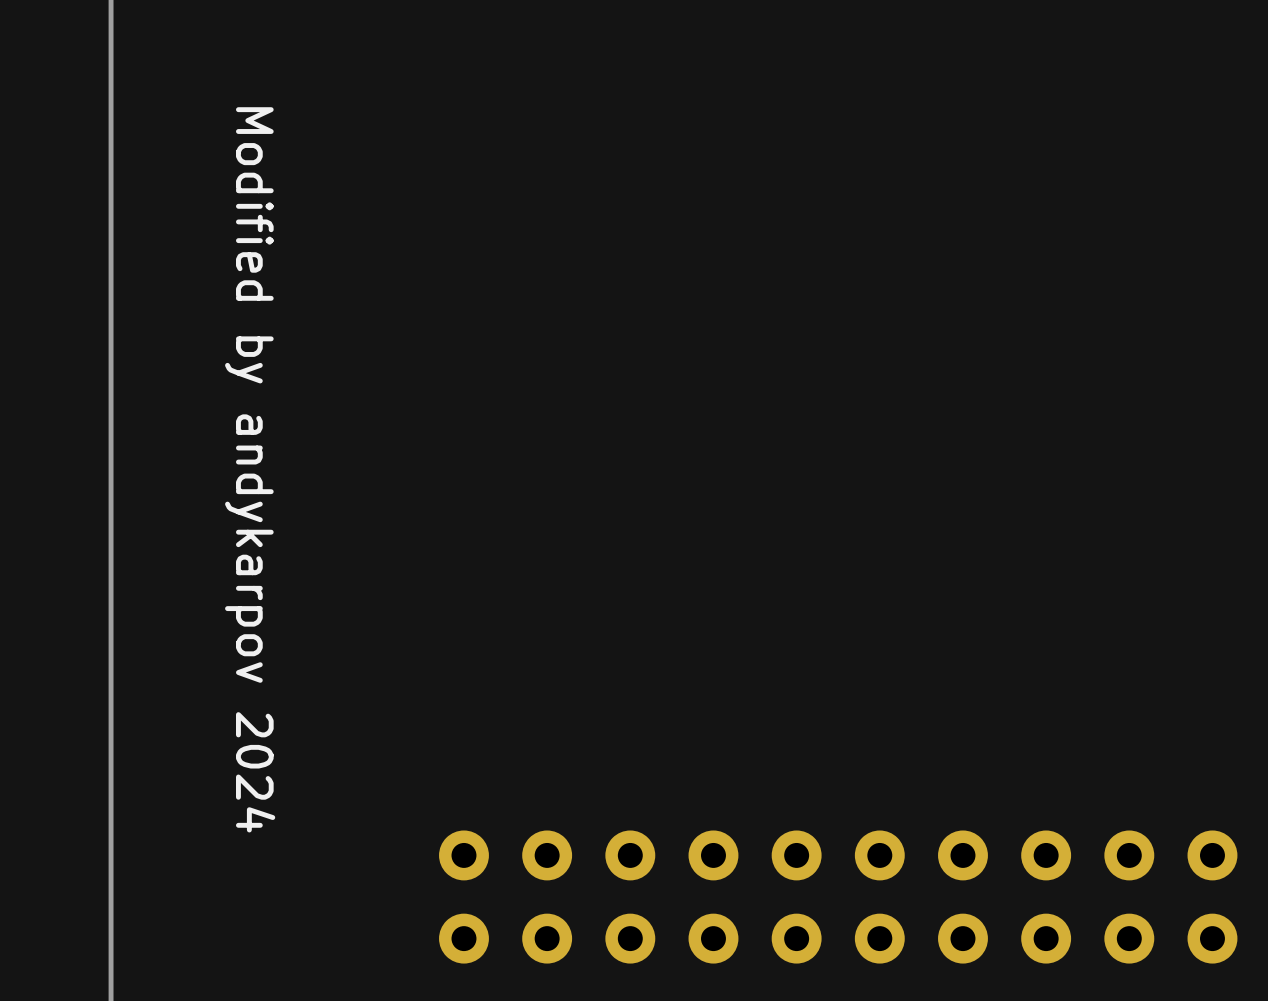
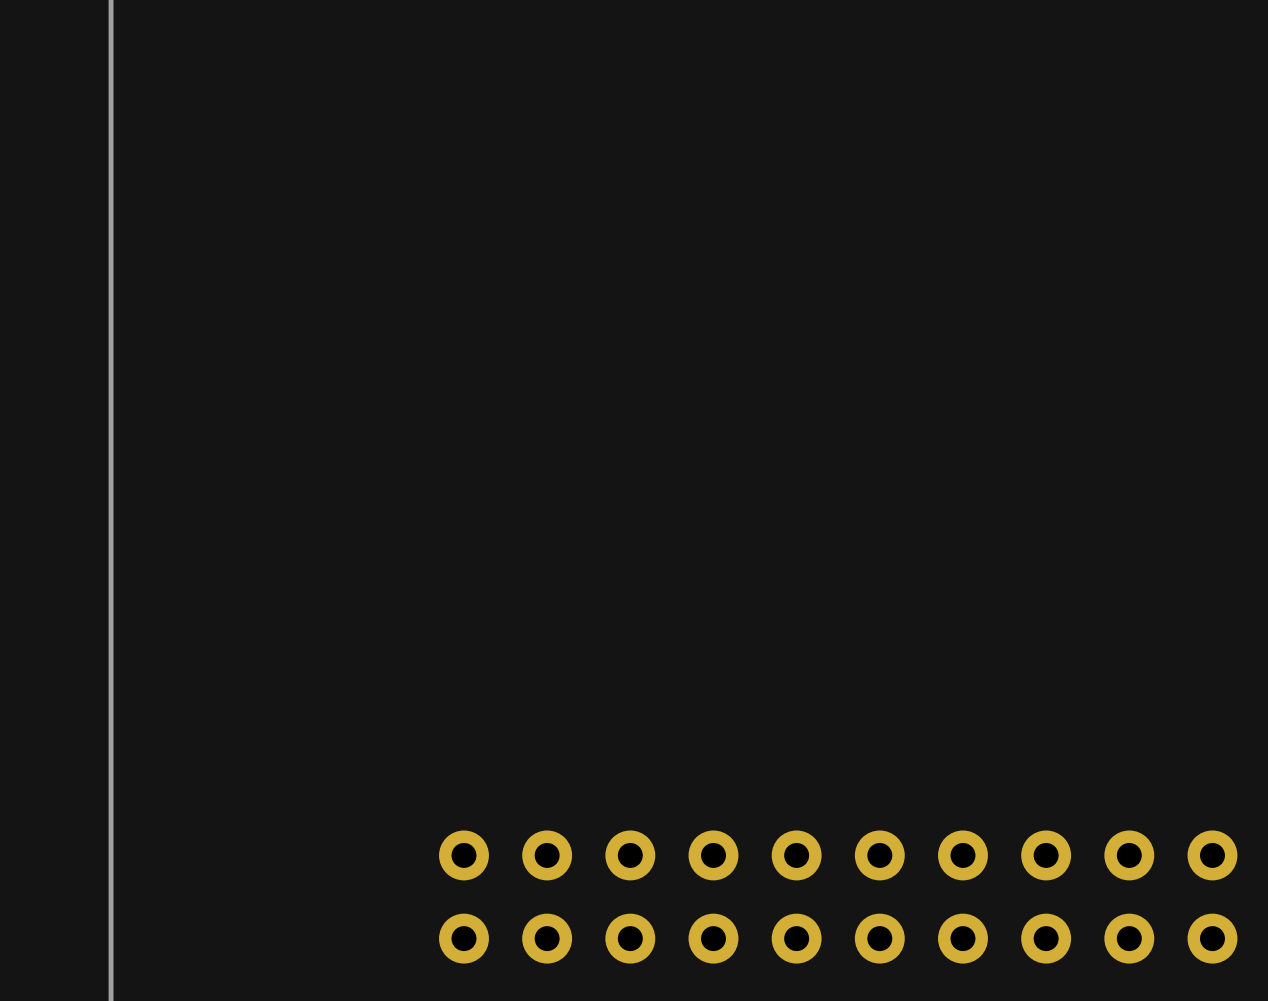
text: Modified by andykarpov 2024 (250, 469) -> none

